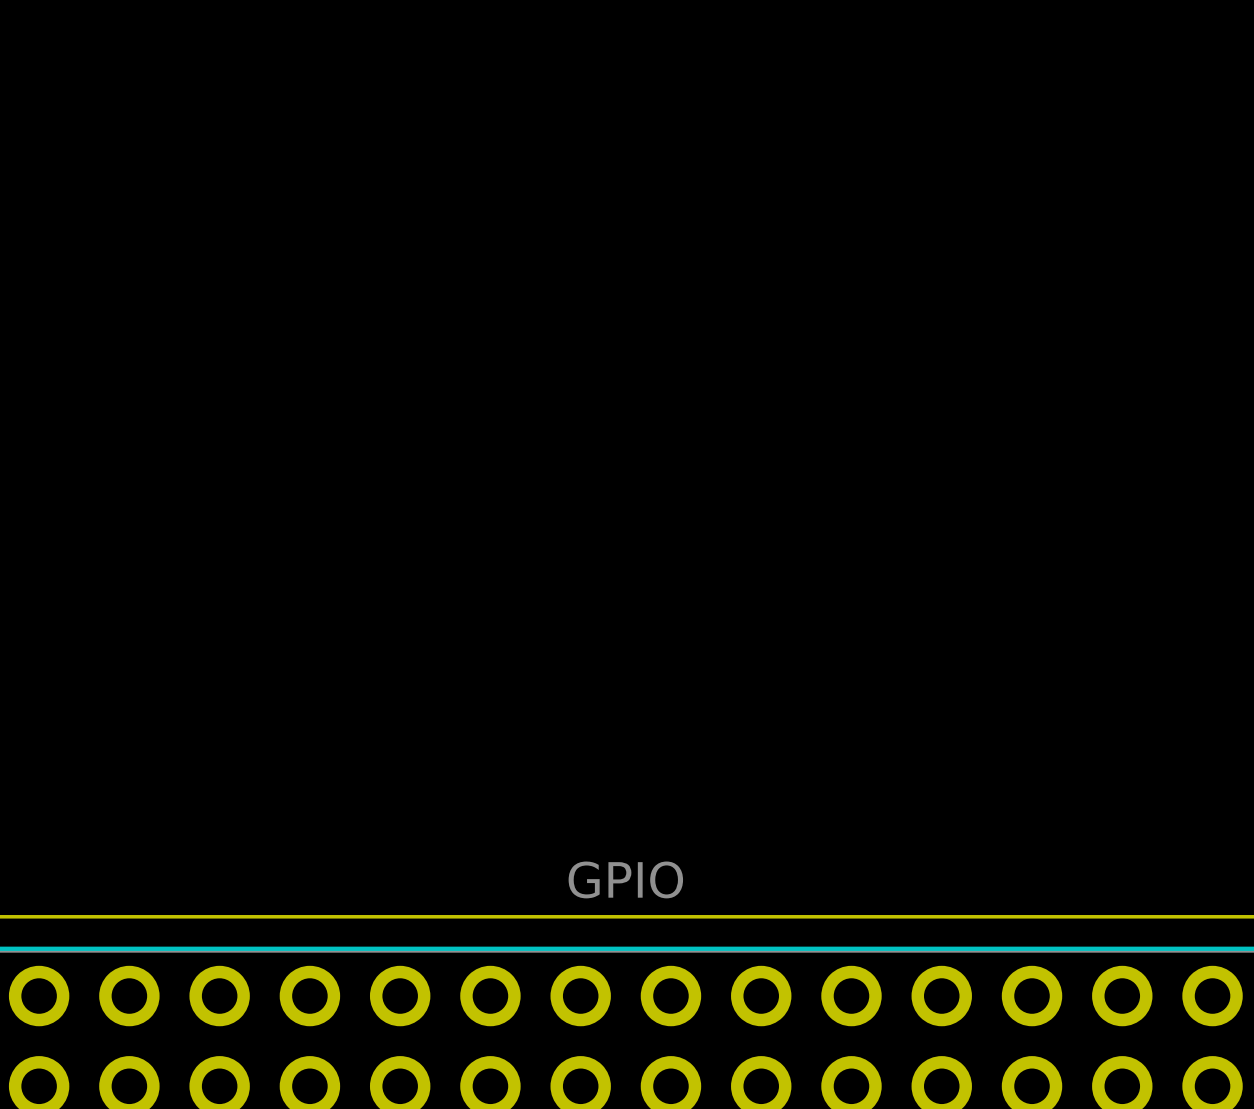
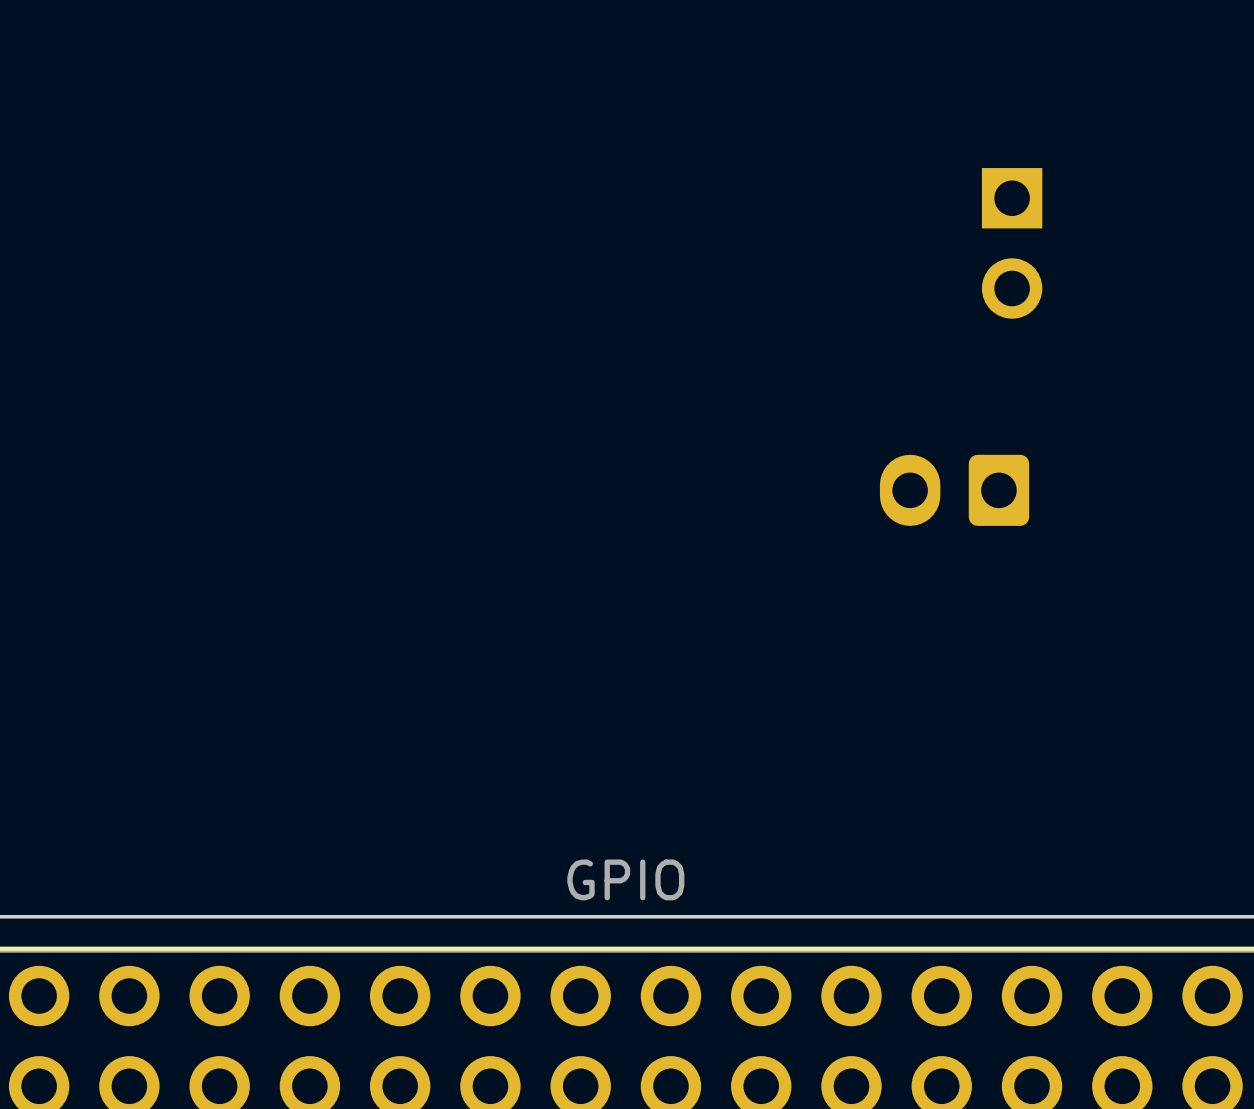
part: none -> (1012, 243)
part: none -> (954, 490)

